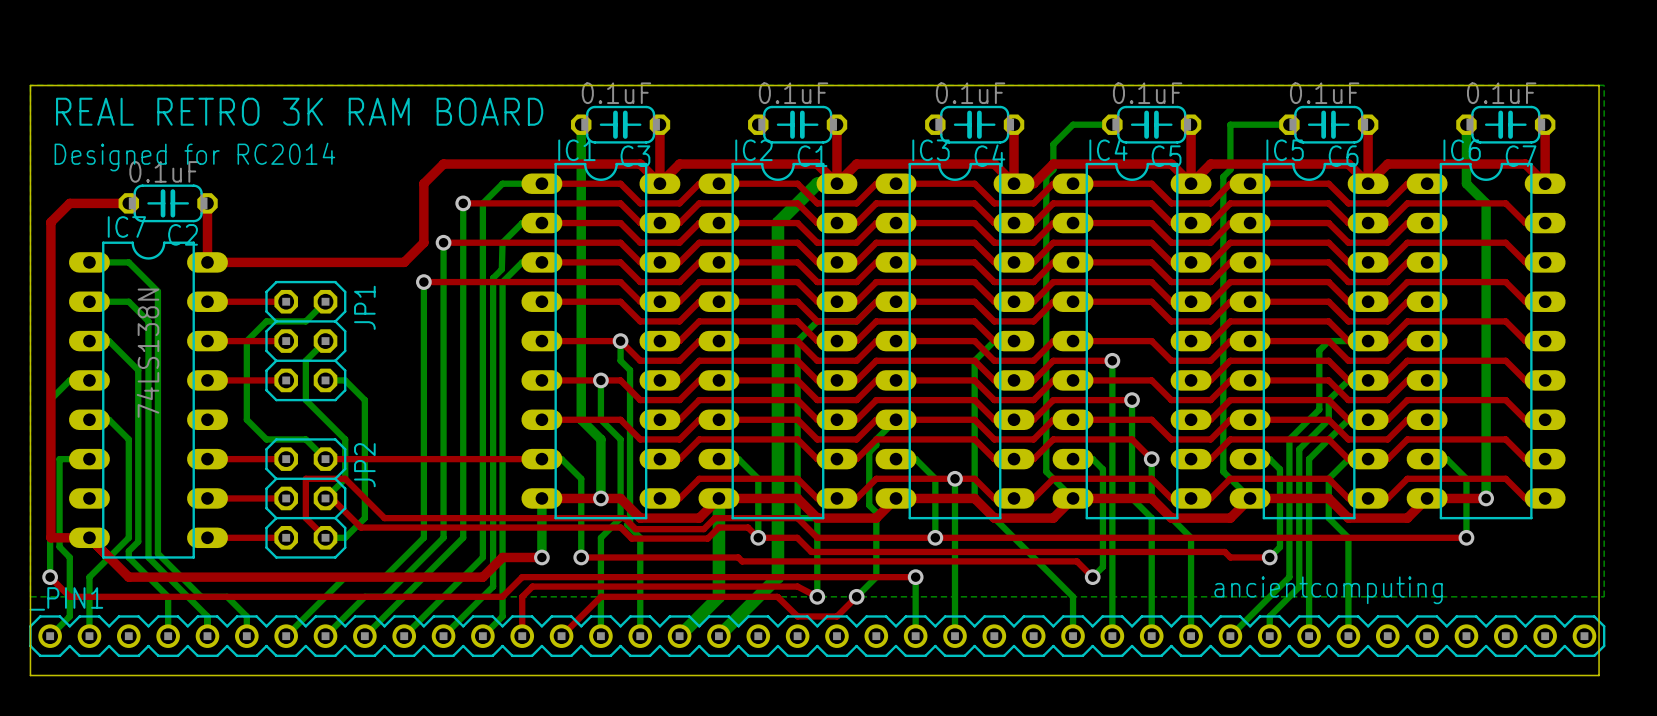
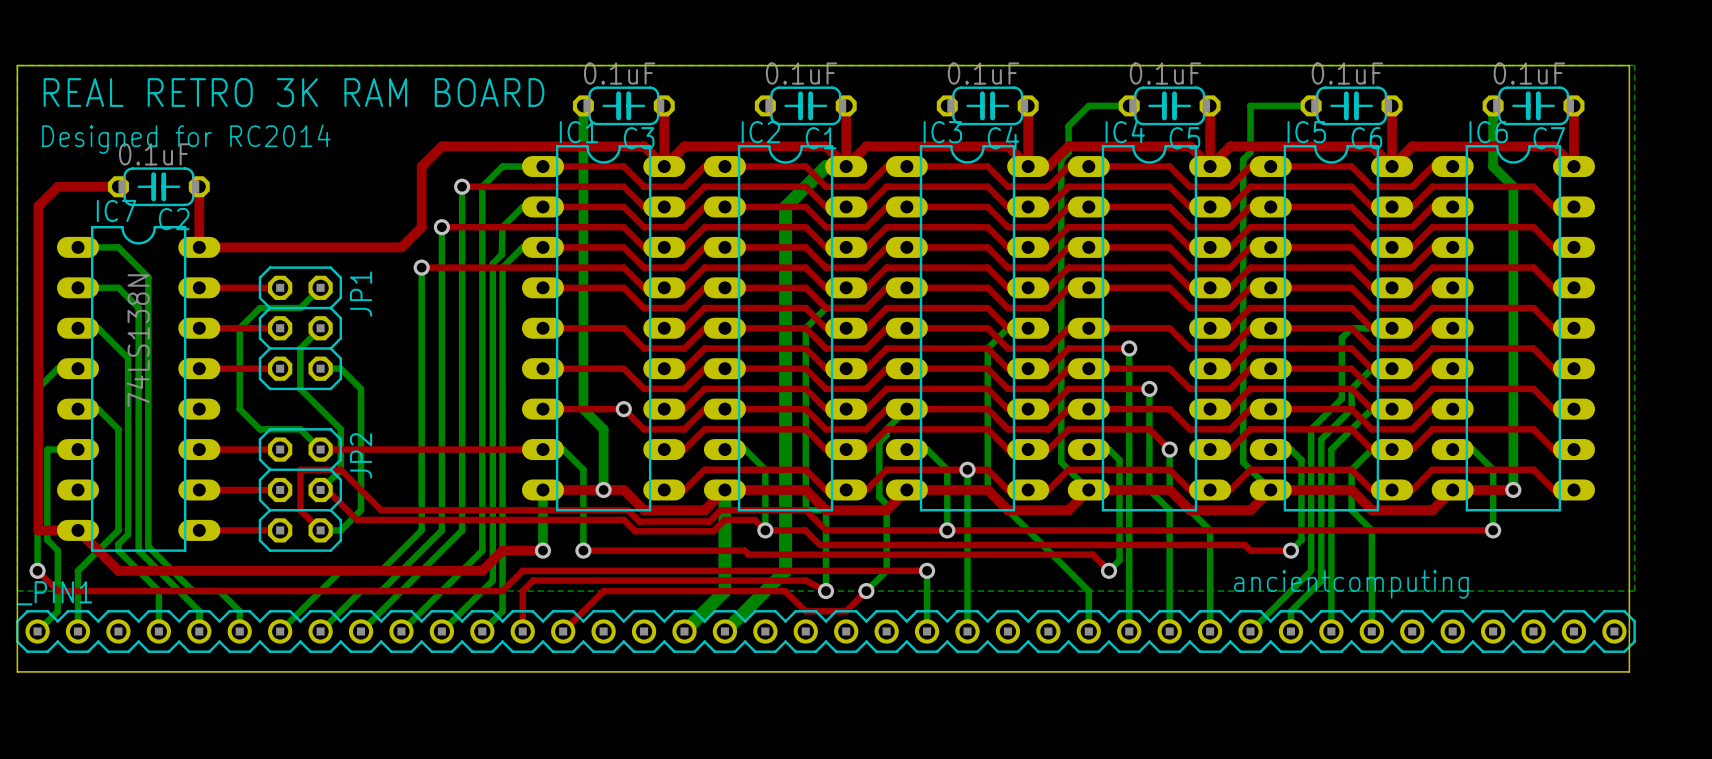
bottom track: (620, 341) (620, 360) (630, 370) (630, 522) (627, 524) (640, 537) (640, 636) -> none
via: (620, 341) -> none
bottom track: (600, 380) (600, 419) (620, 439) (620, 518) (600, 537) (600, 636) -> none
via: (600, 380) -> none
via: none -> (623, 409)

